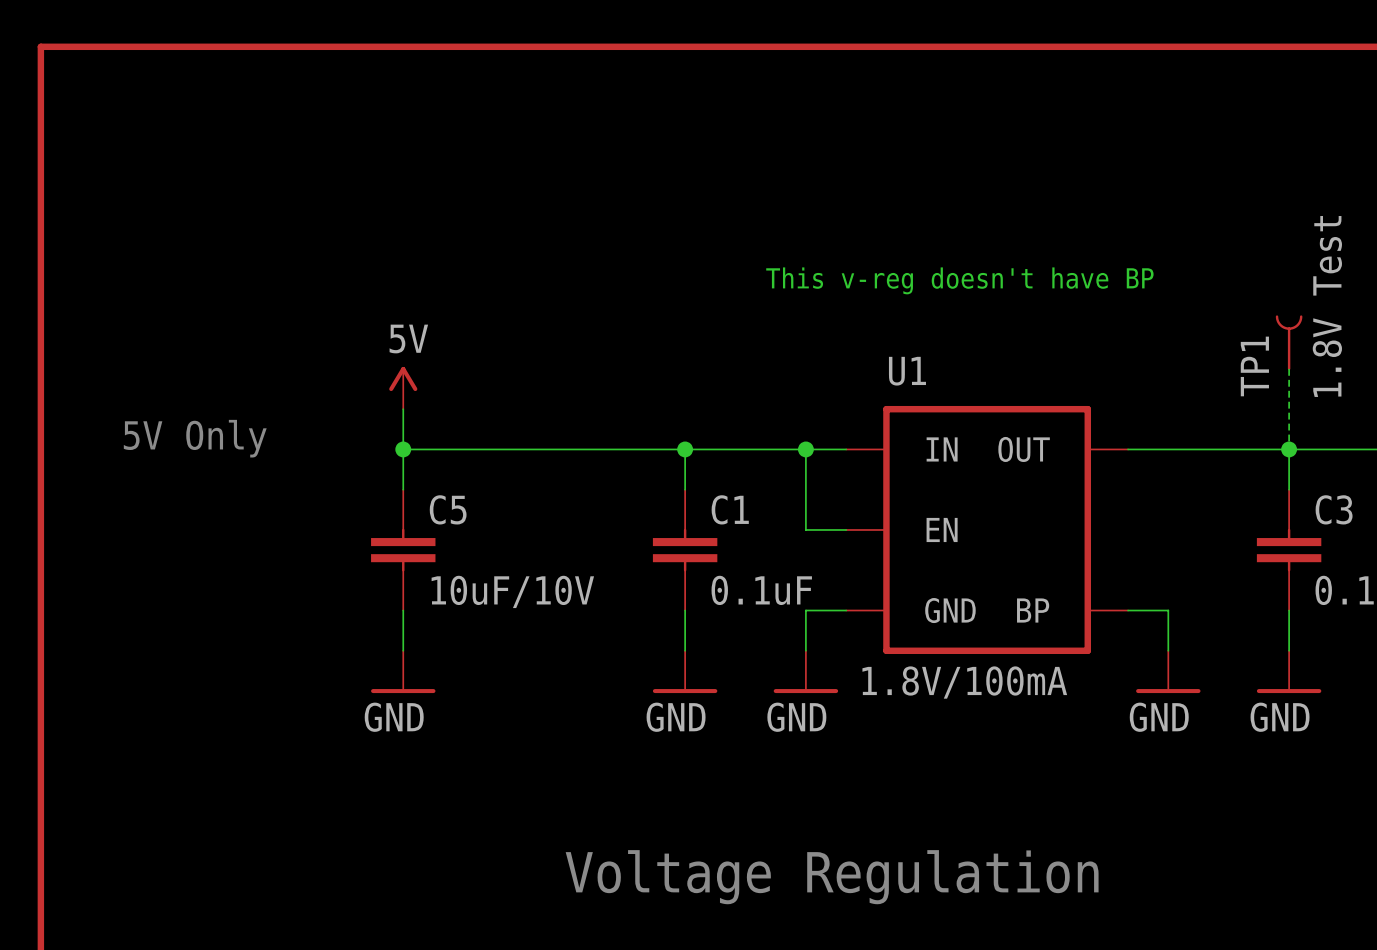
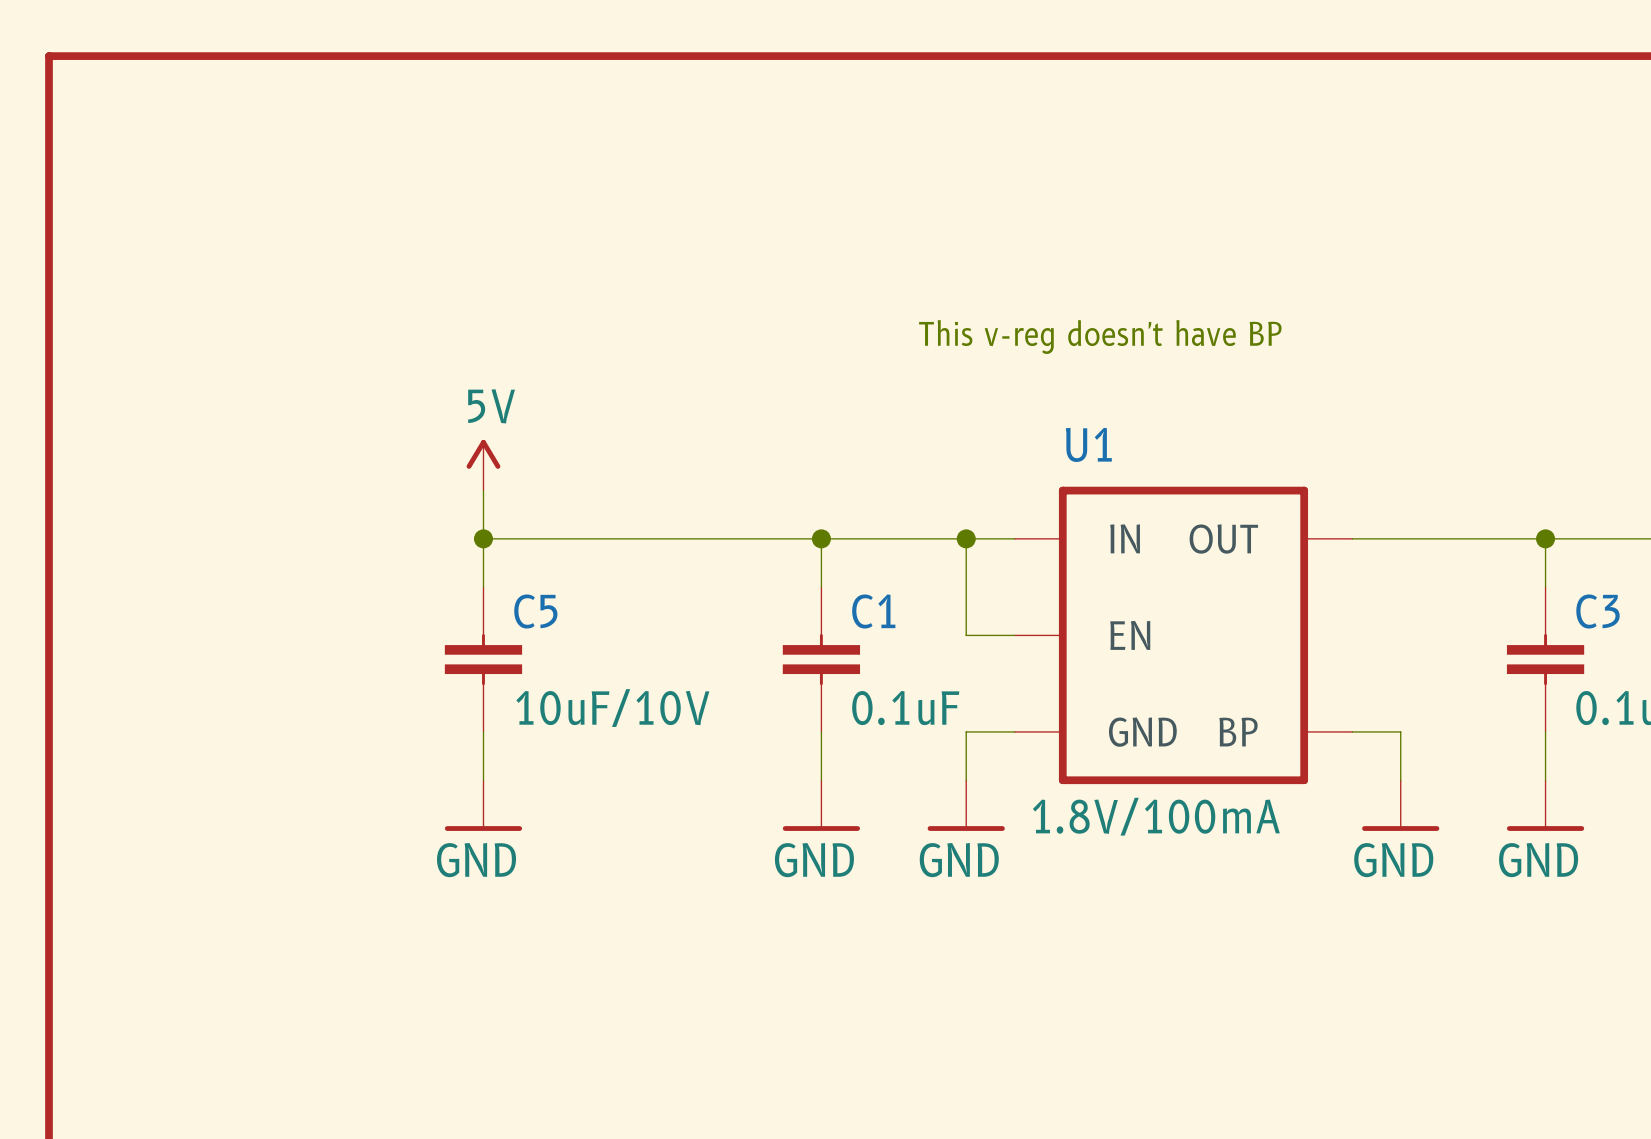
TP1: 1.8V Test (1289, 342) -> none
wire: (1289, 368) (1289, 449) -> none
text: 5V Only (195, 438) -> none
text: Voltage Regulation (832, 877) -> none

